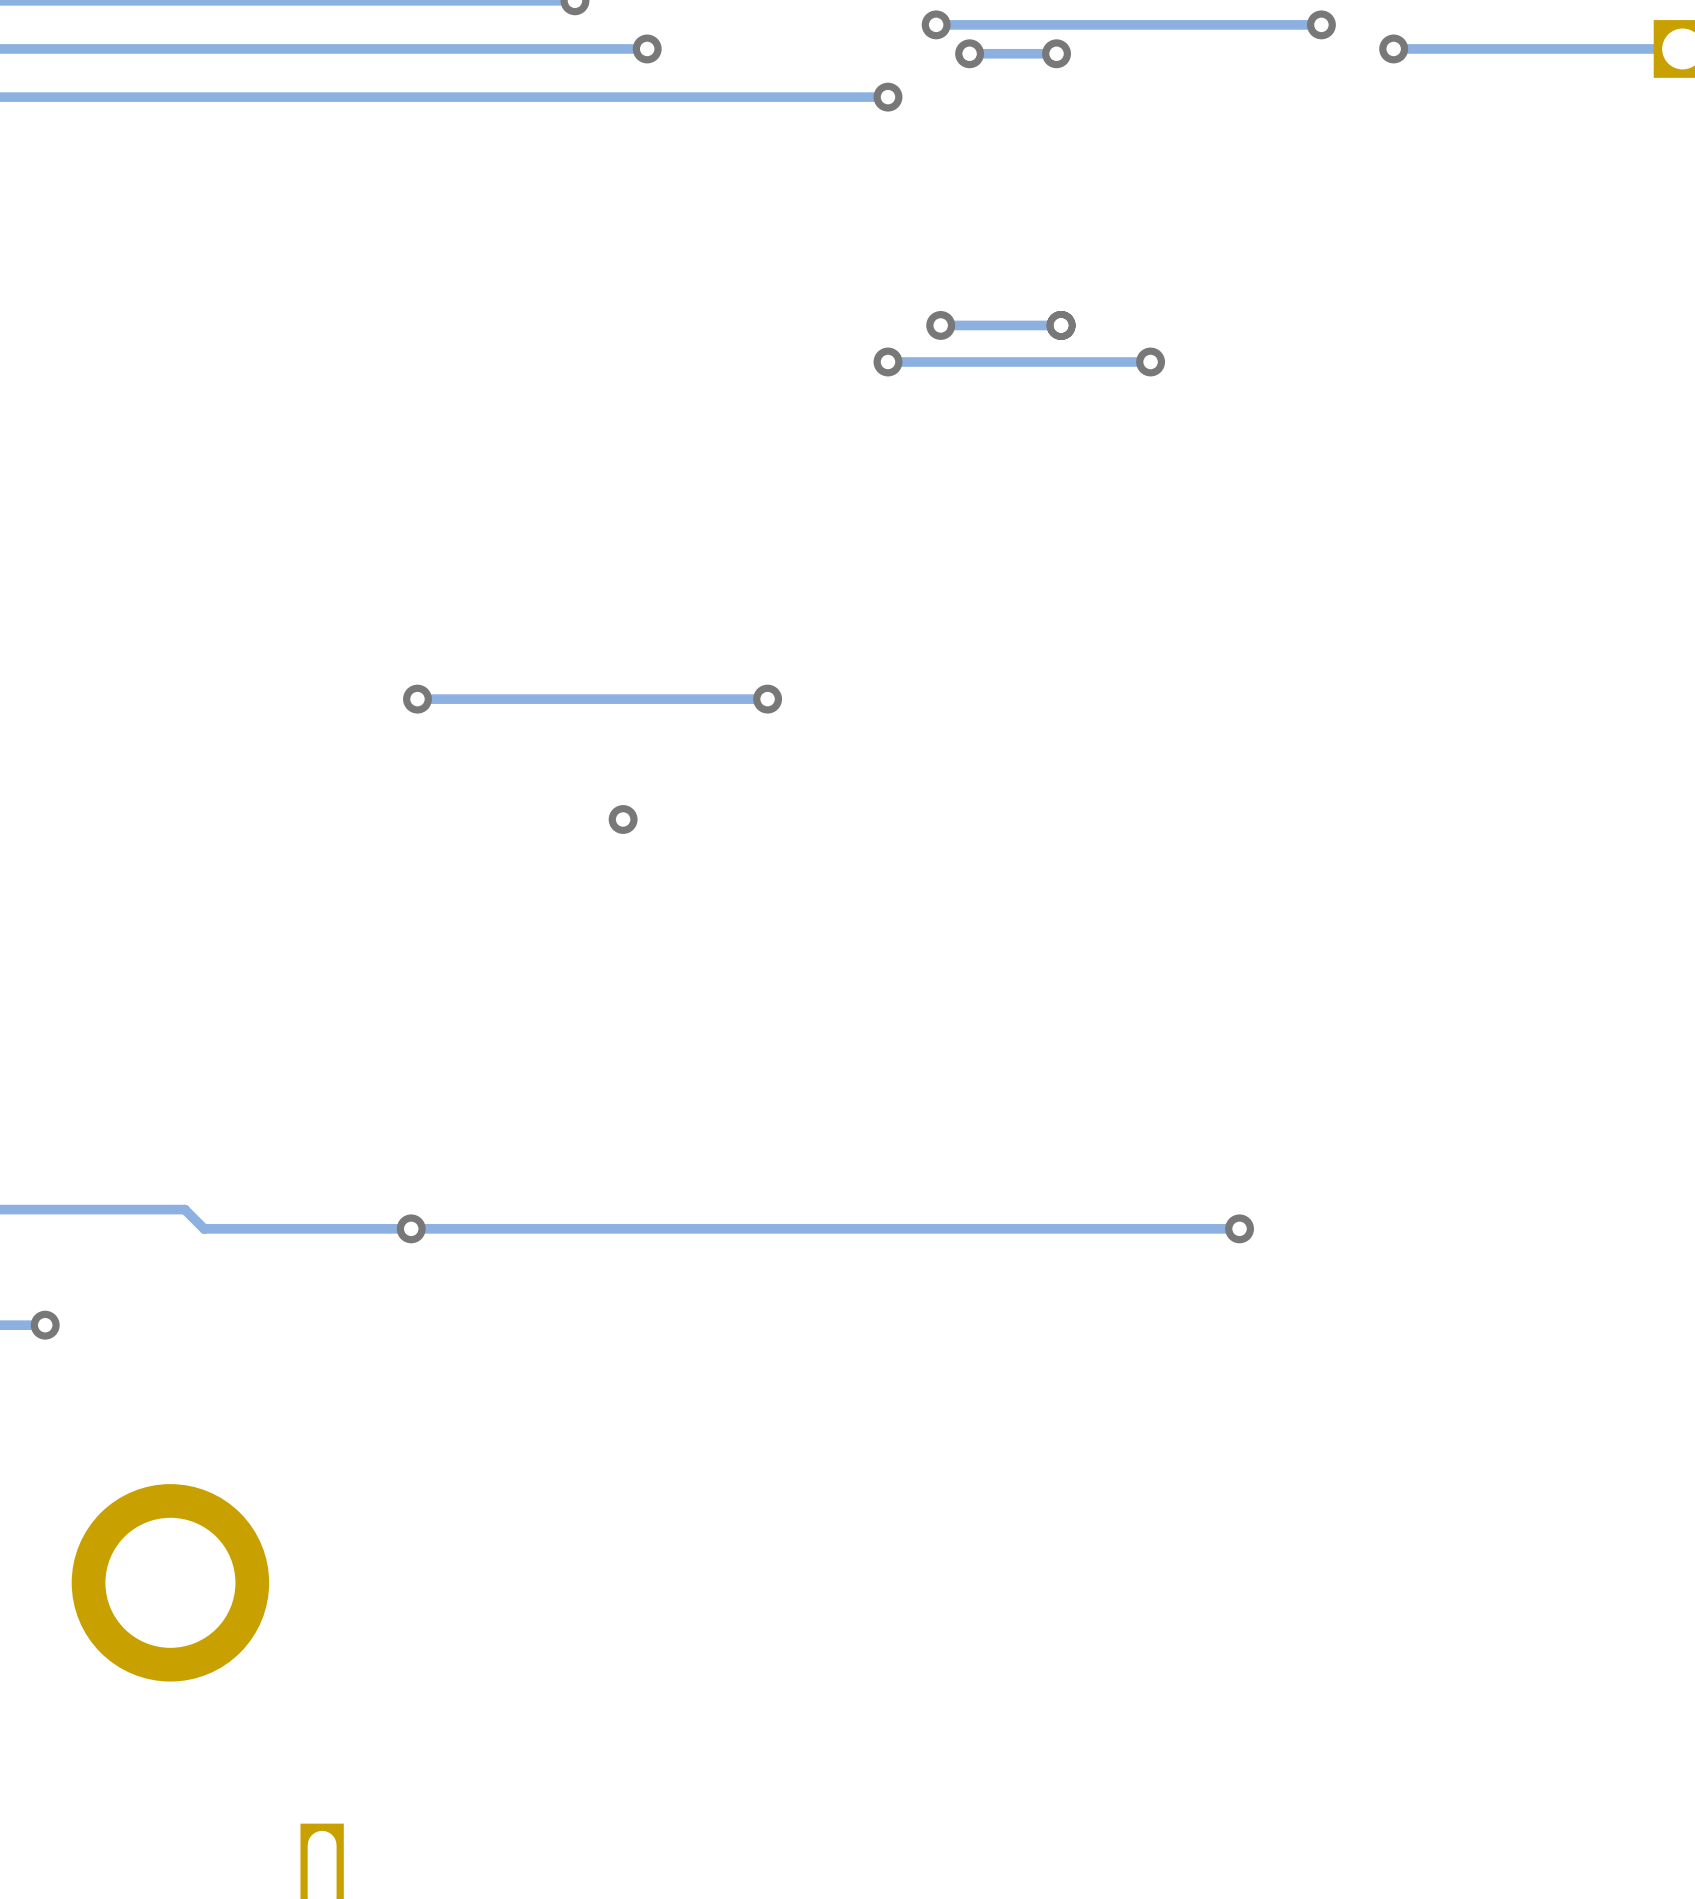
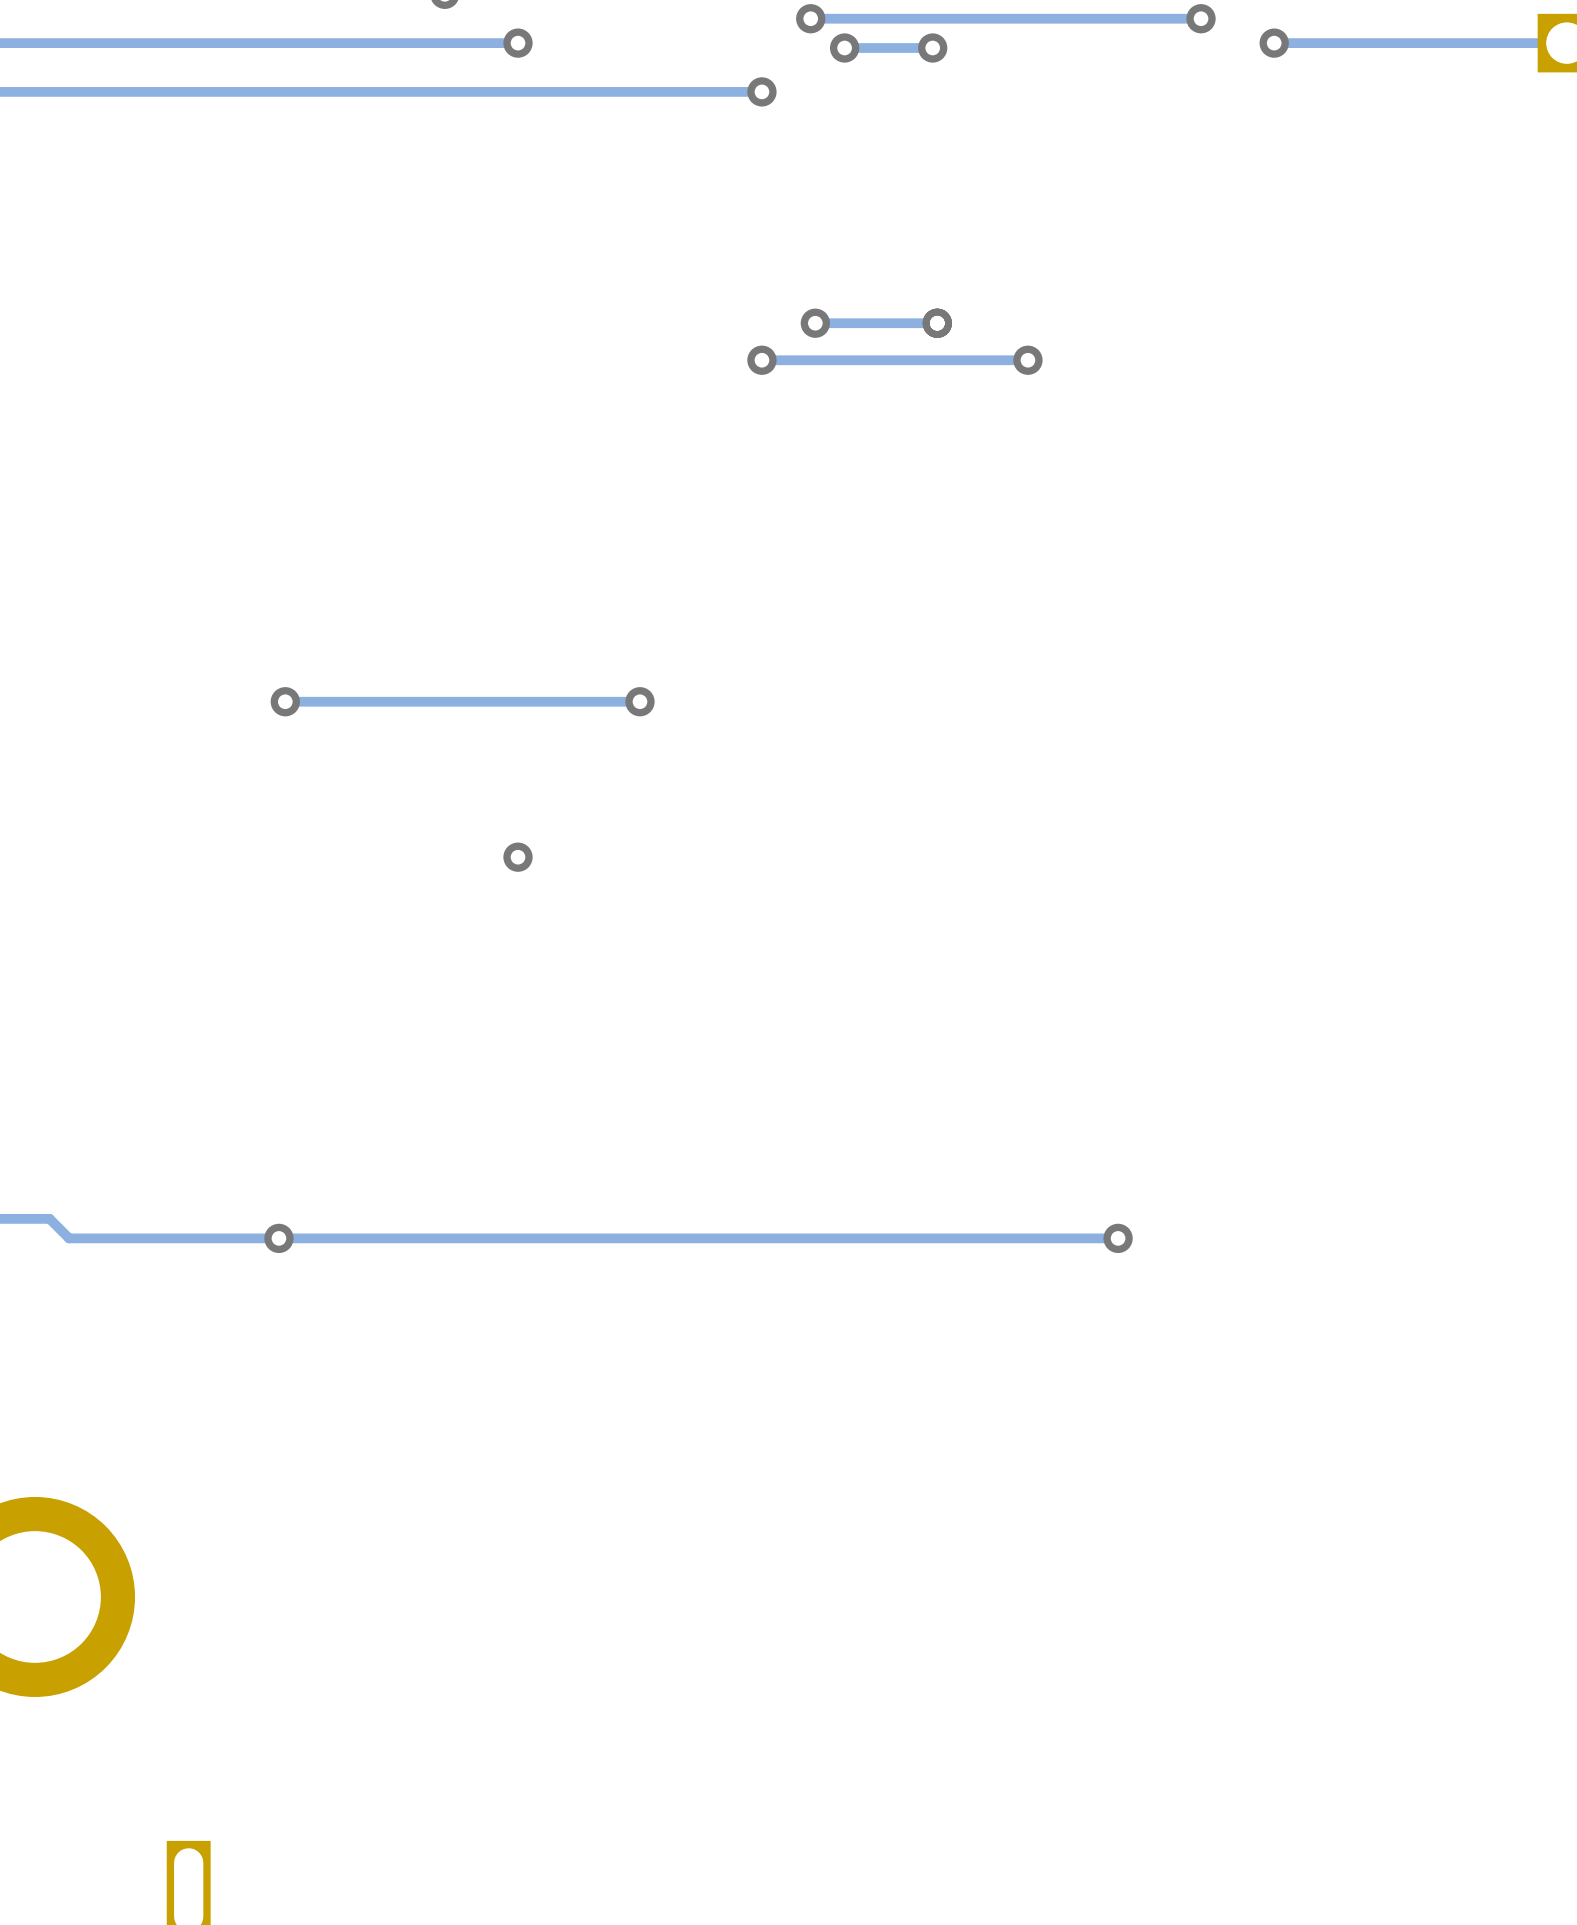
via position: (623, 819) -> (518, 857)

